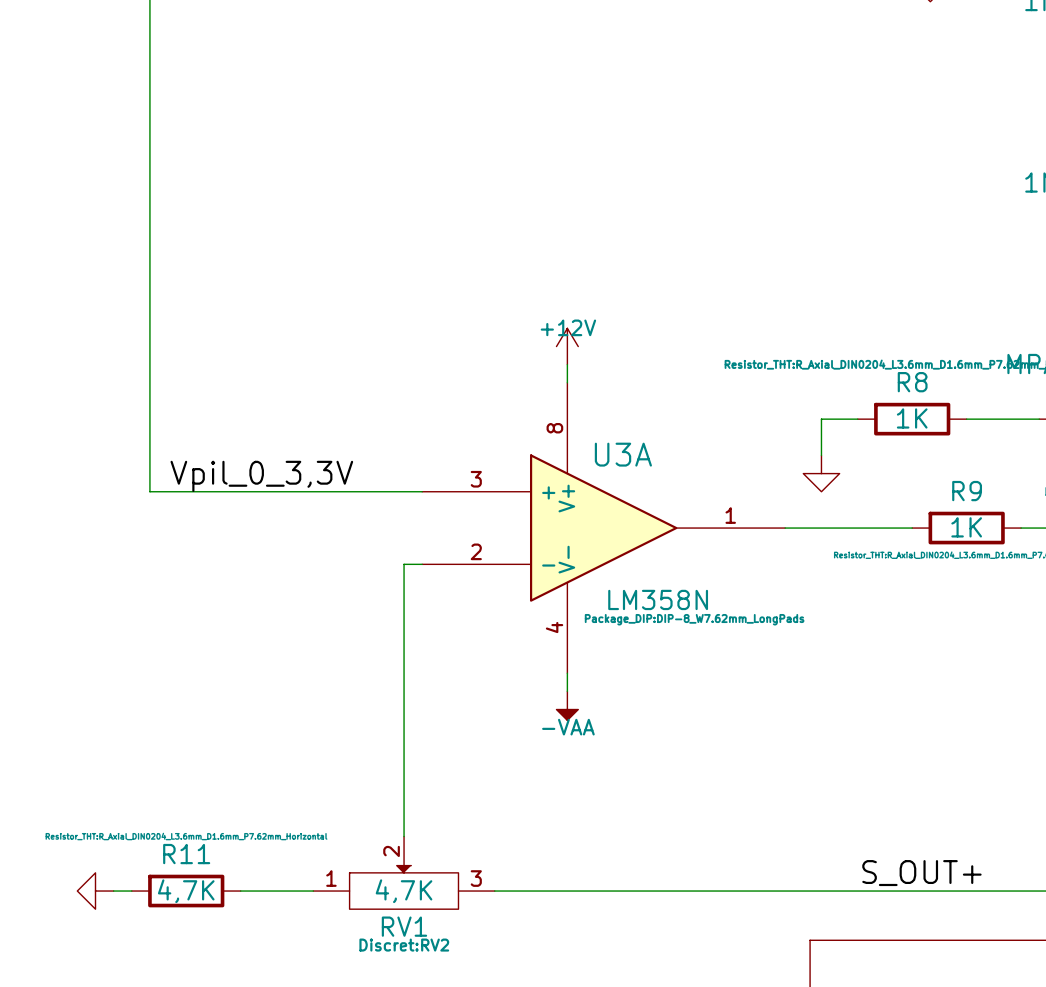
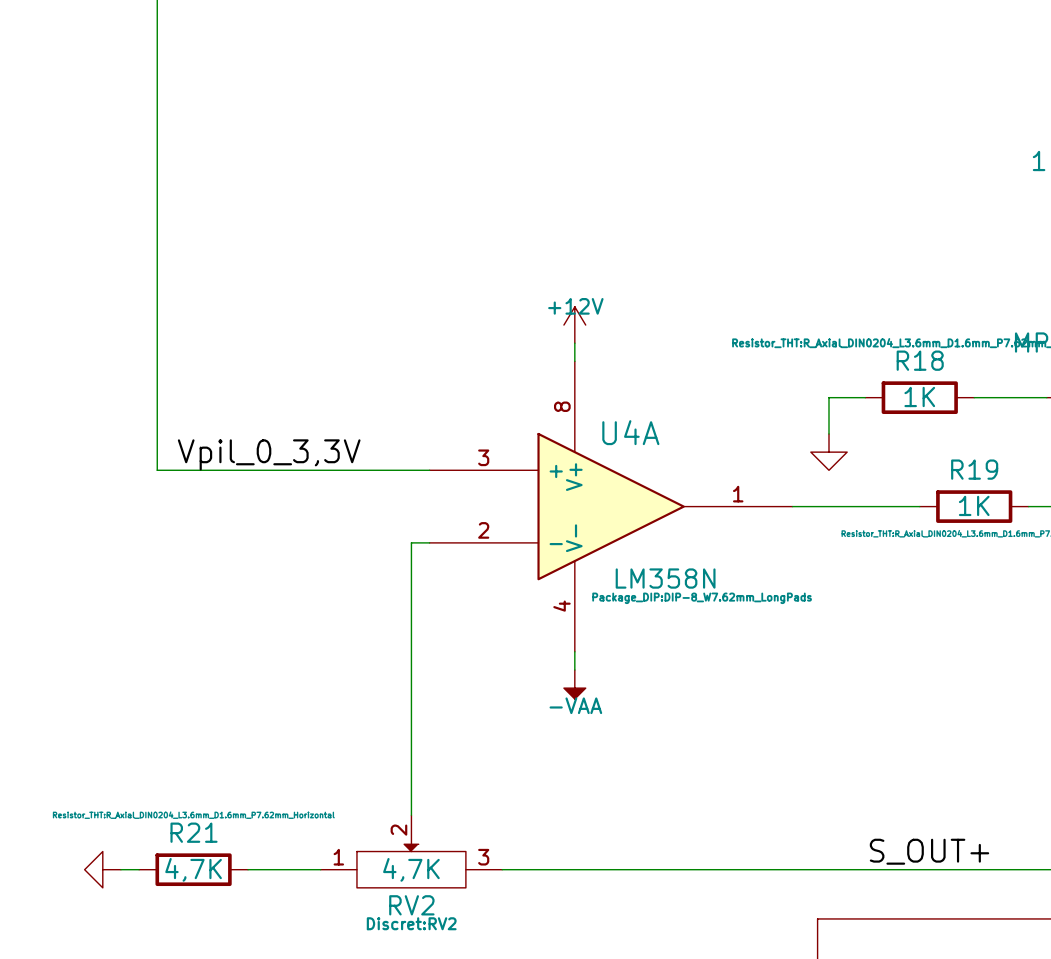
R8 name: R8 (912, 382) -> R18 (920, 360)
U3A name: U3A (623, 454) -> U4A (630, 432)
R9 name: R9 (967, 491) -> R19 (974, 469)
R11 name: R11 (186, 854) -> R21 (194, 832)
RV1 name: RV1 (404, 926) -> RV2 (411, 905)

